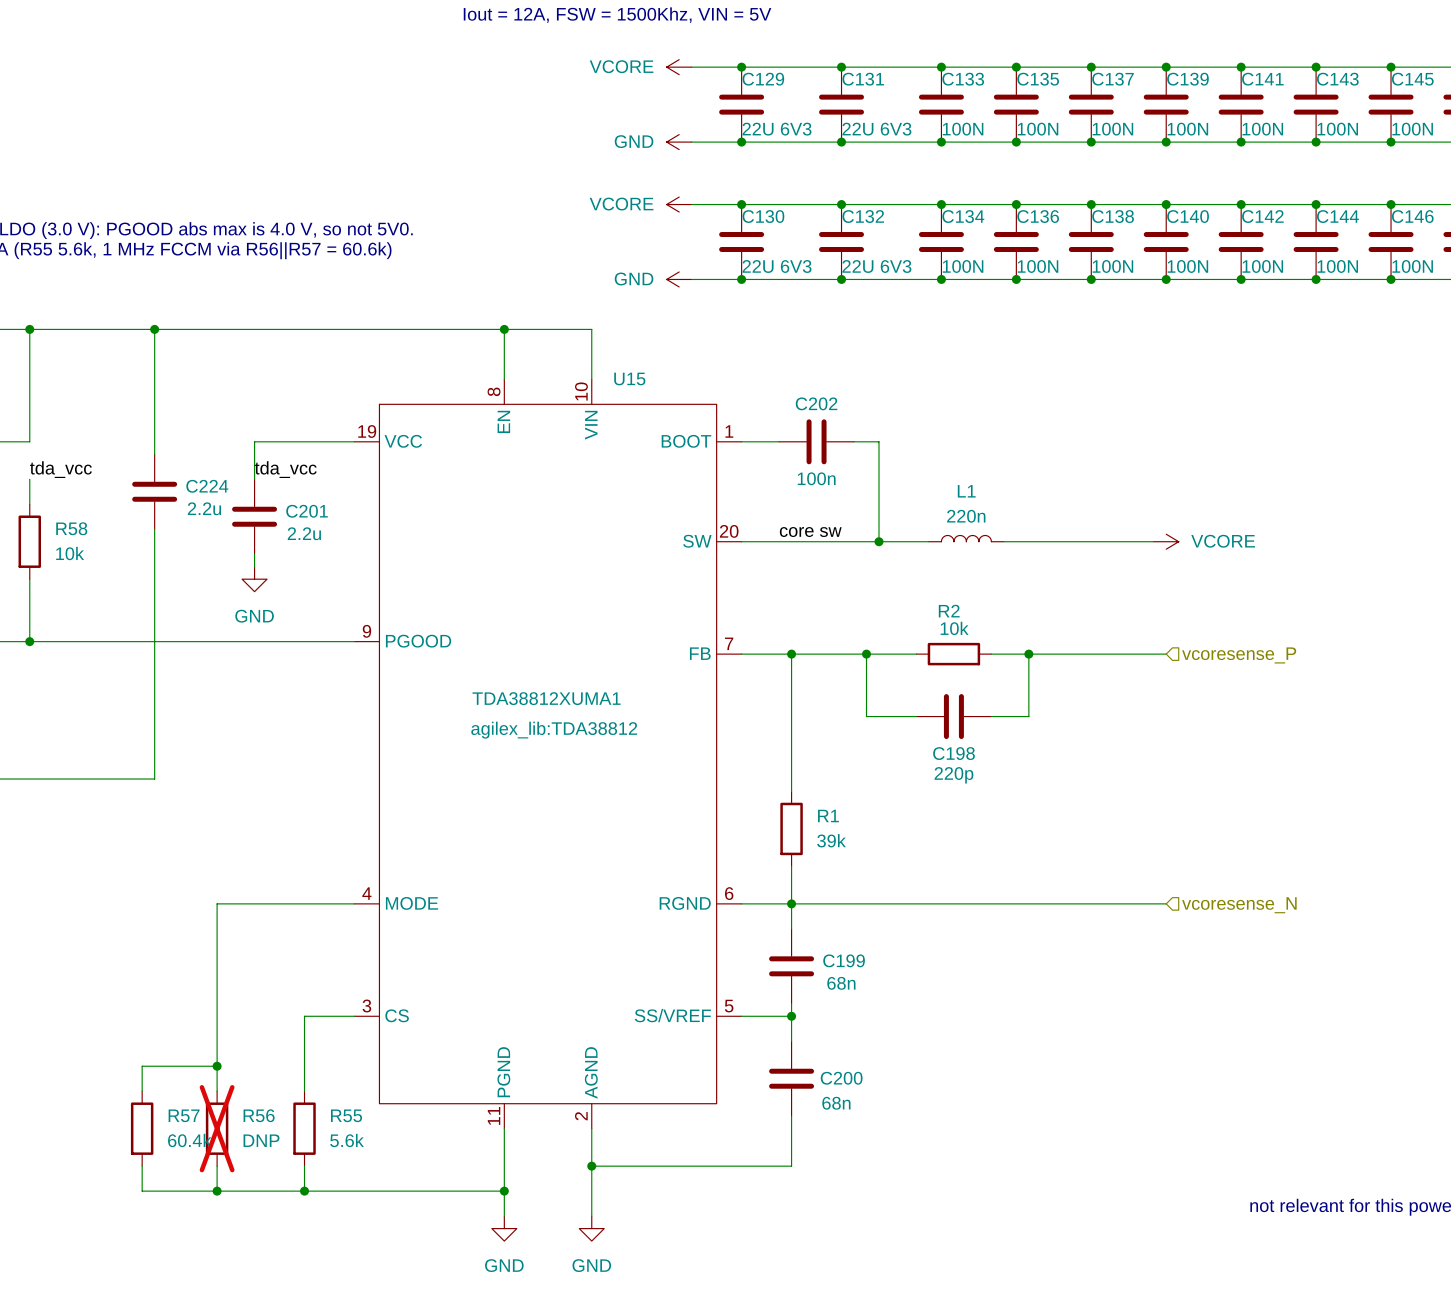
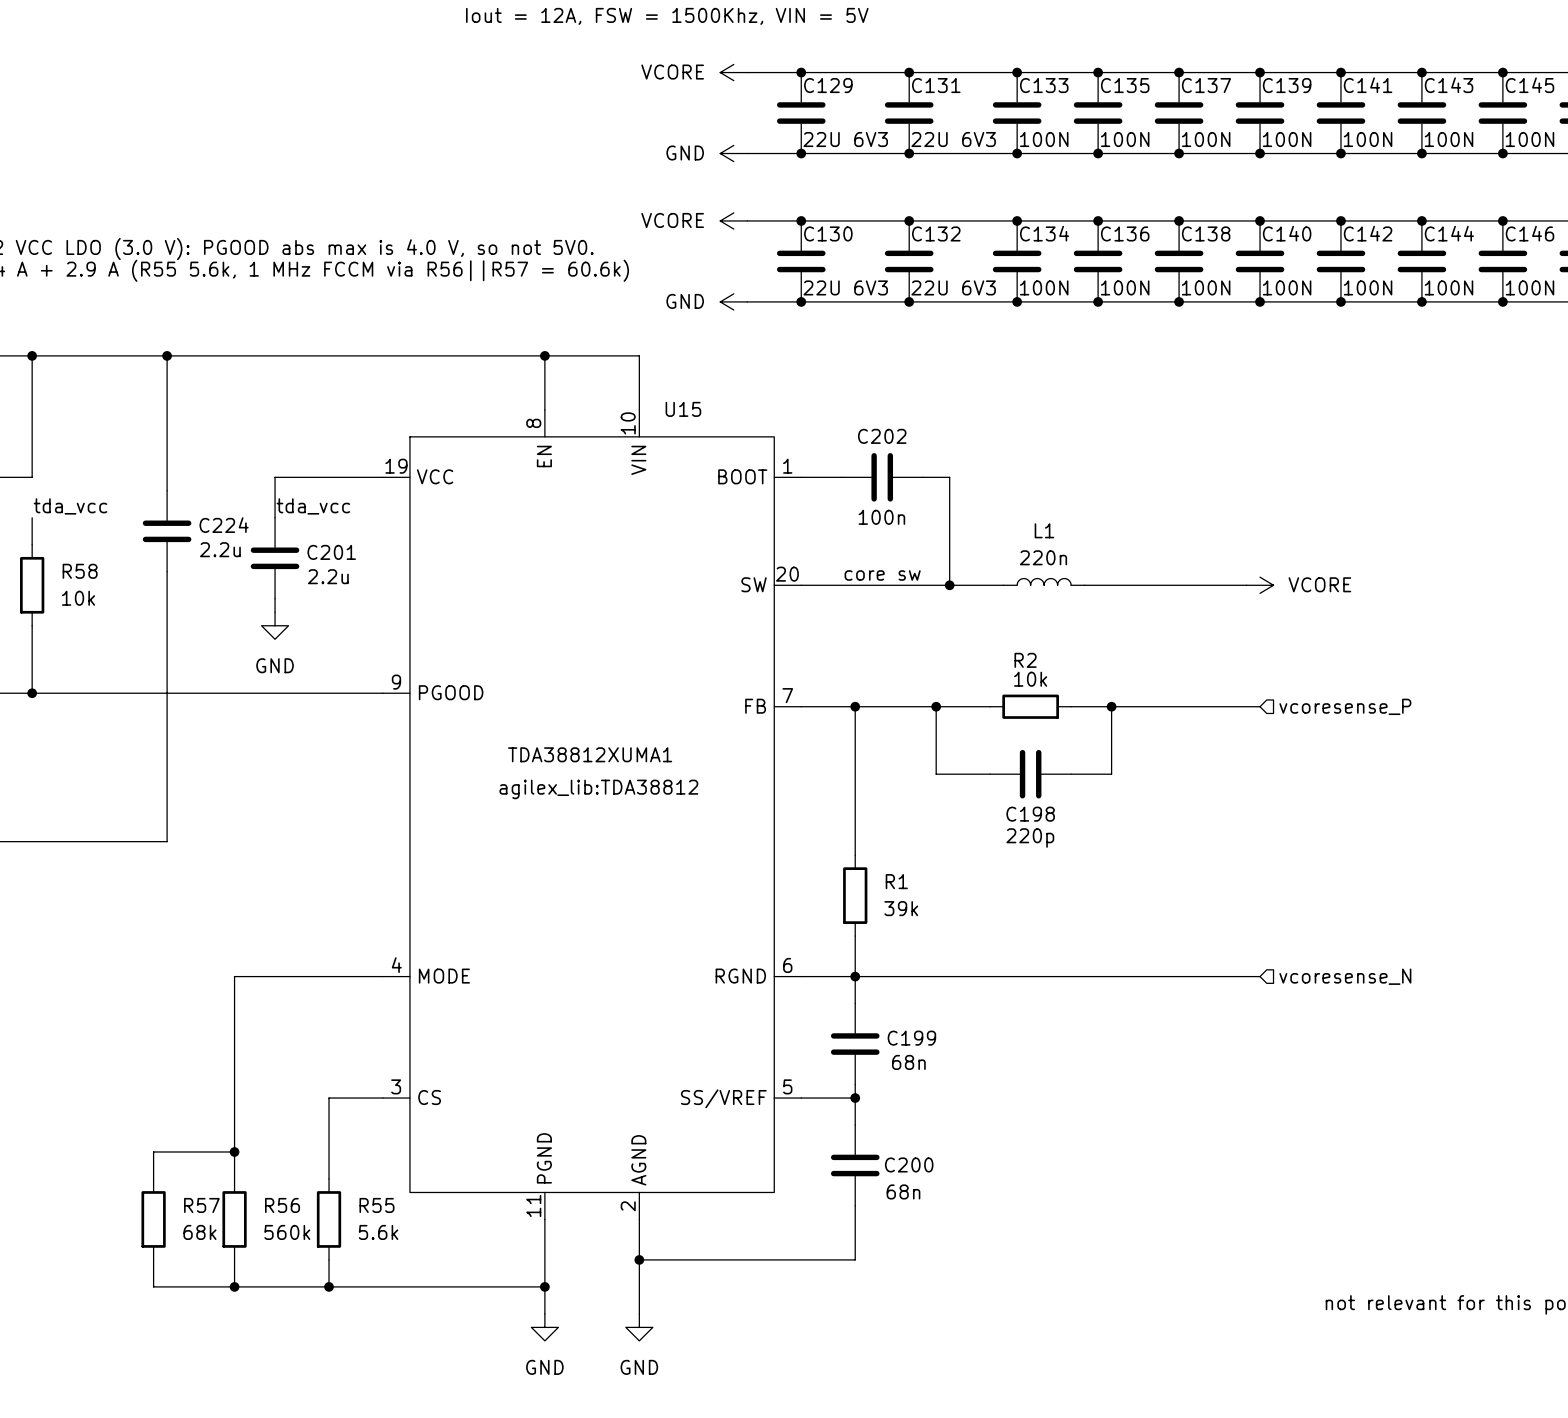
R56 do-not-place cross: (217, 1128) -> none
R57 value: 60.4k (189, 1140) -> 68k (199, 1232)
R56 value: DNP (261, 1140) -> 560k (287, 1232)

